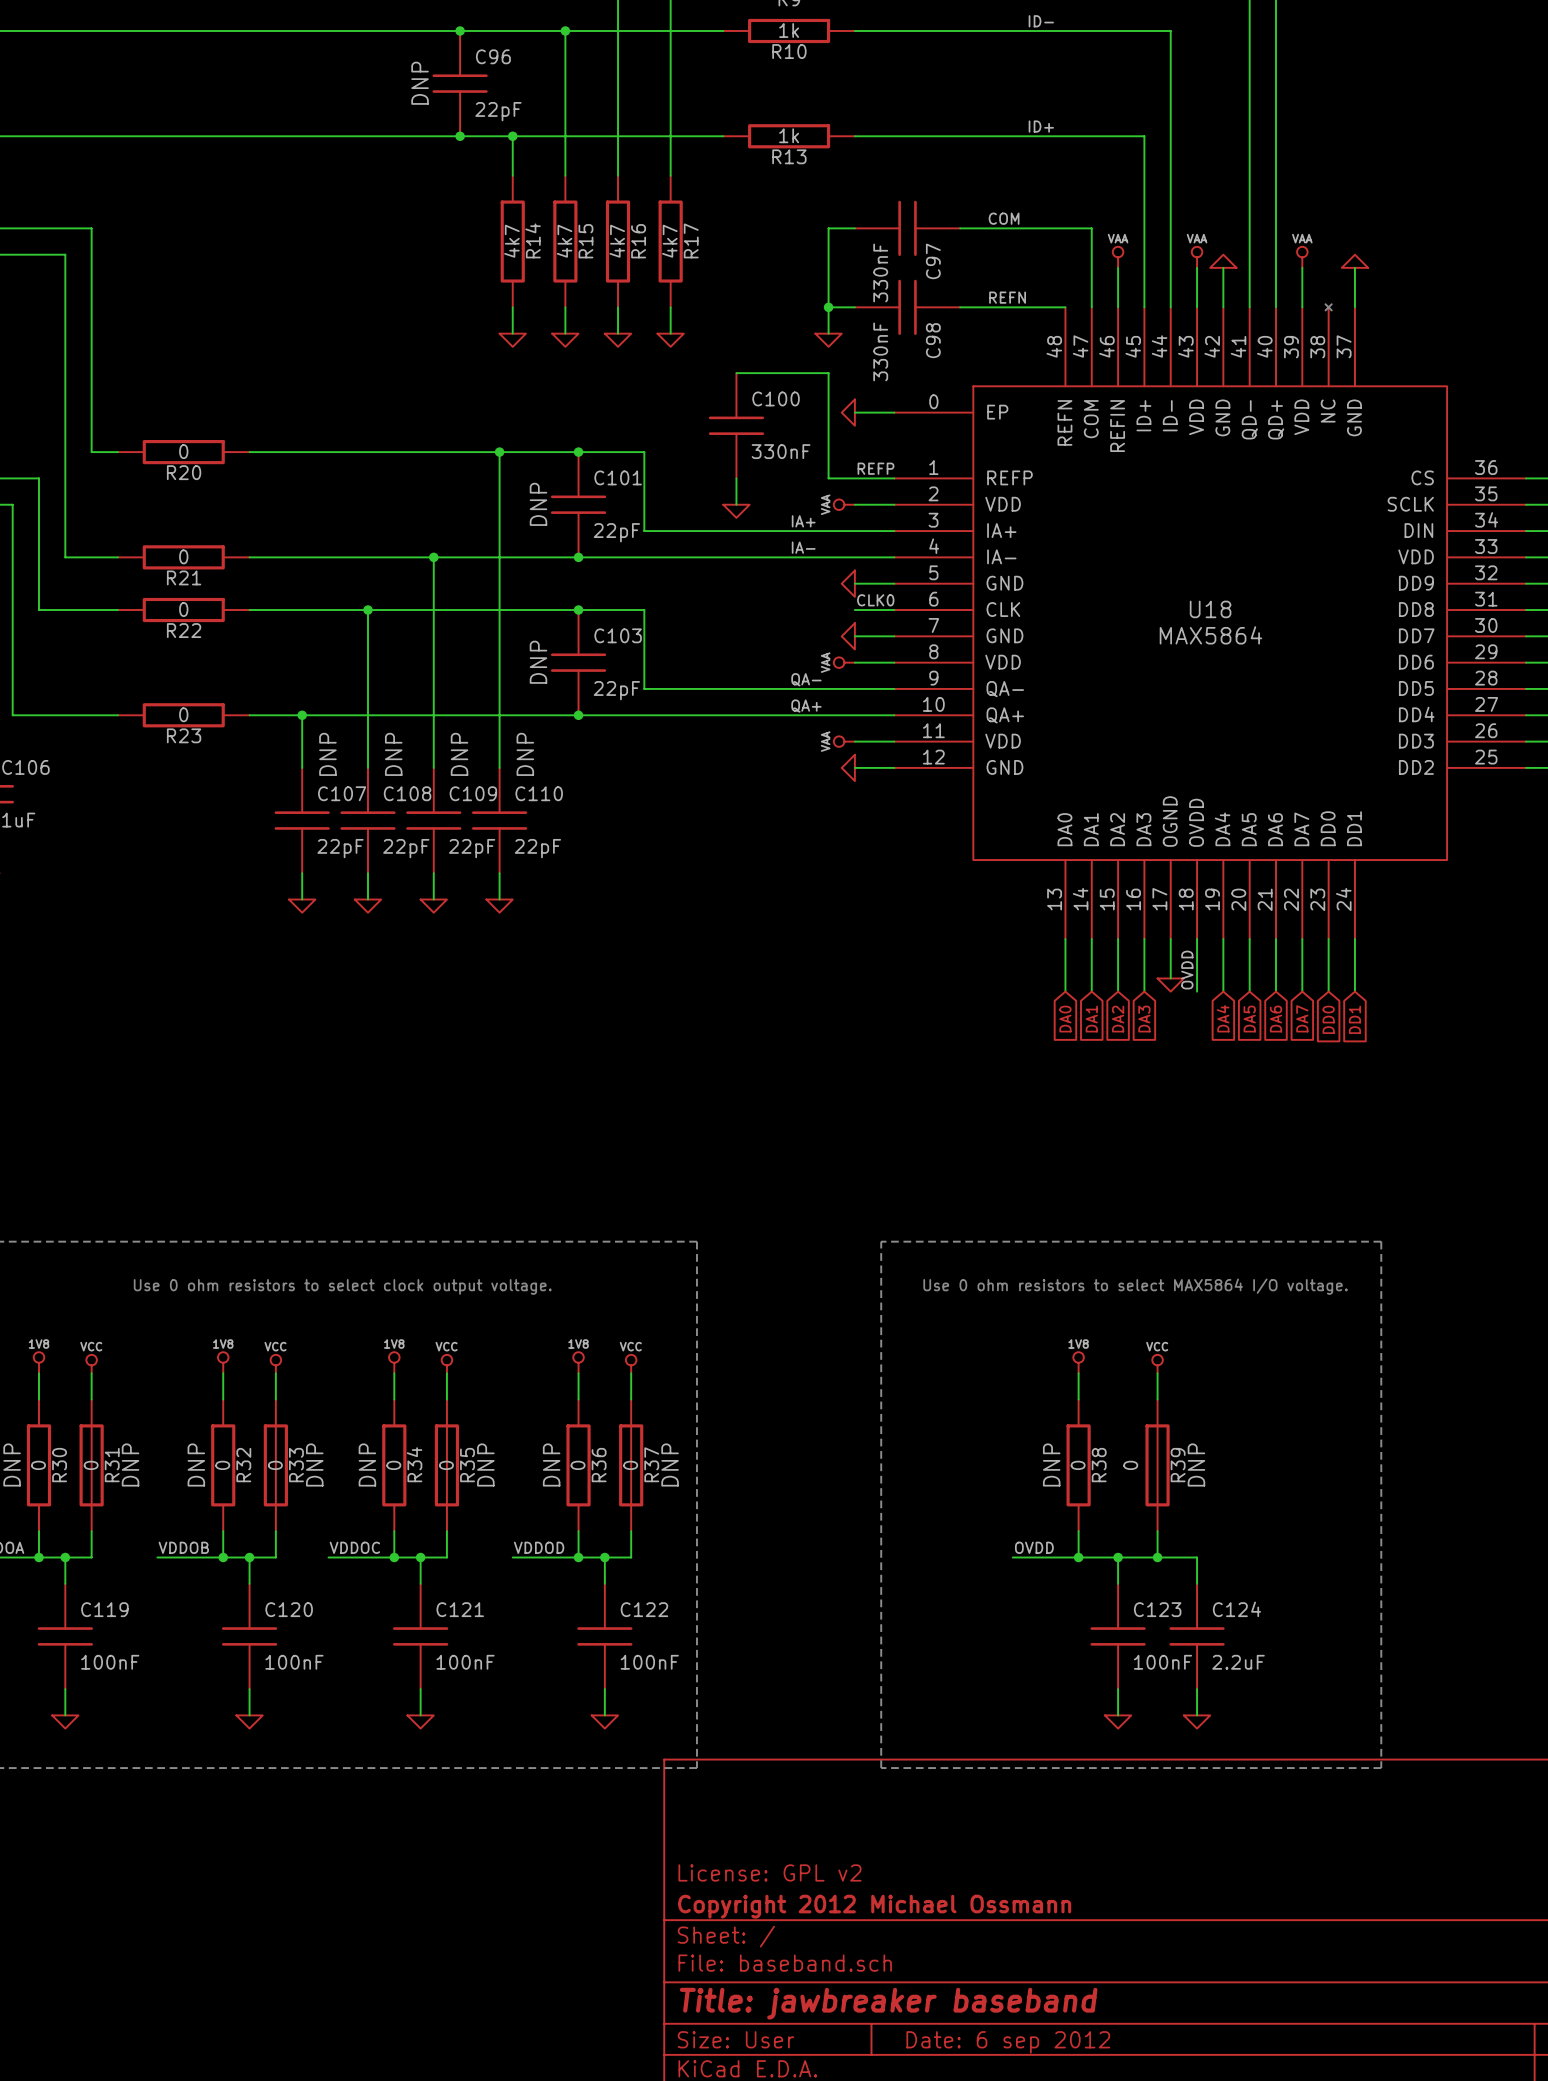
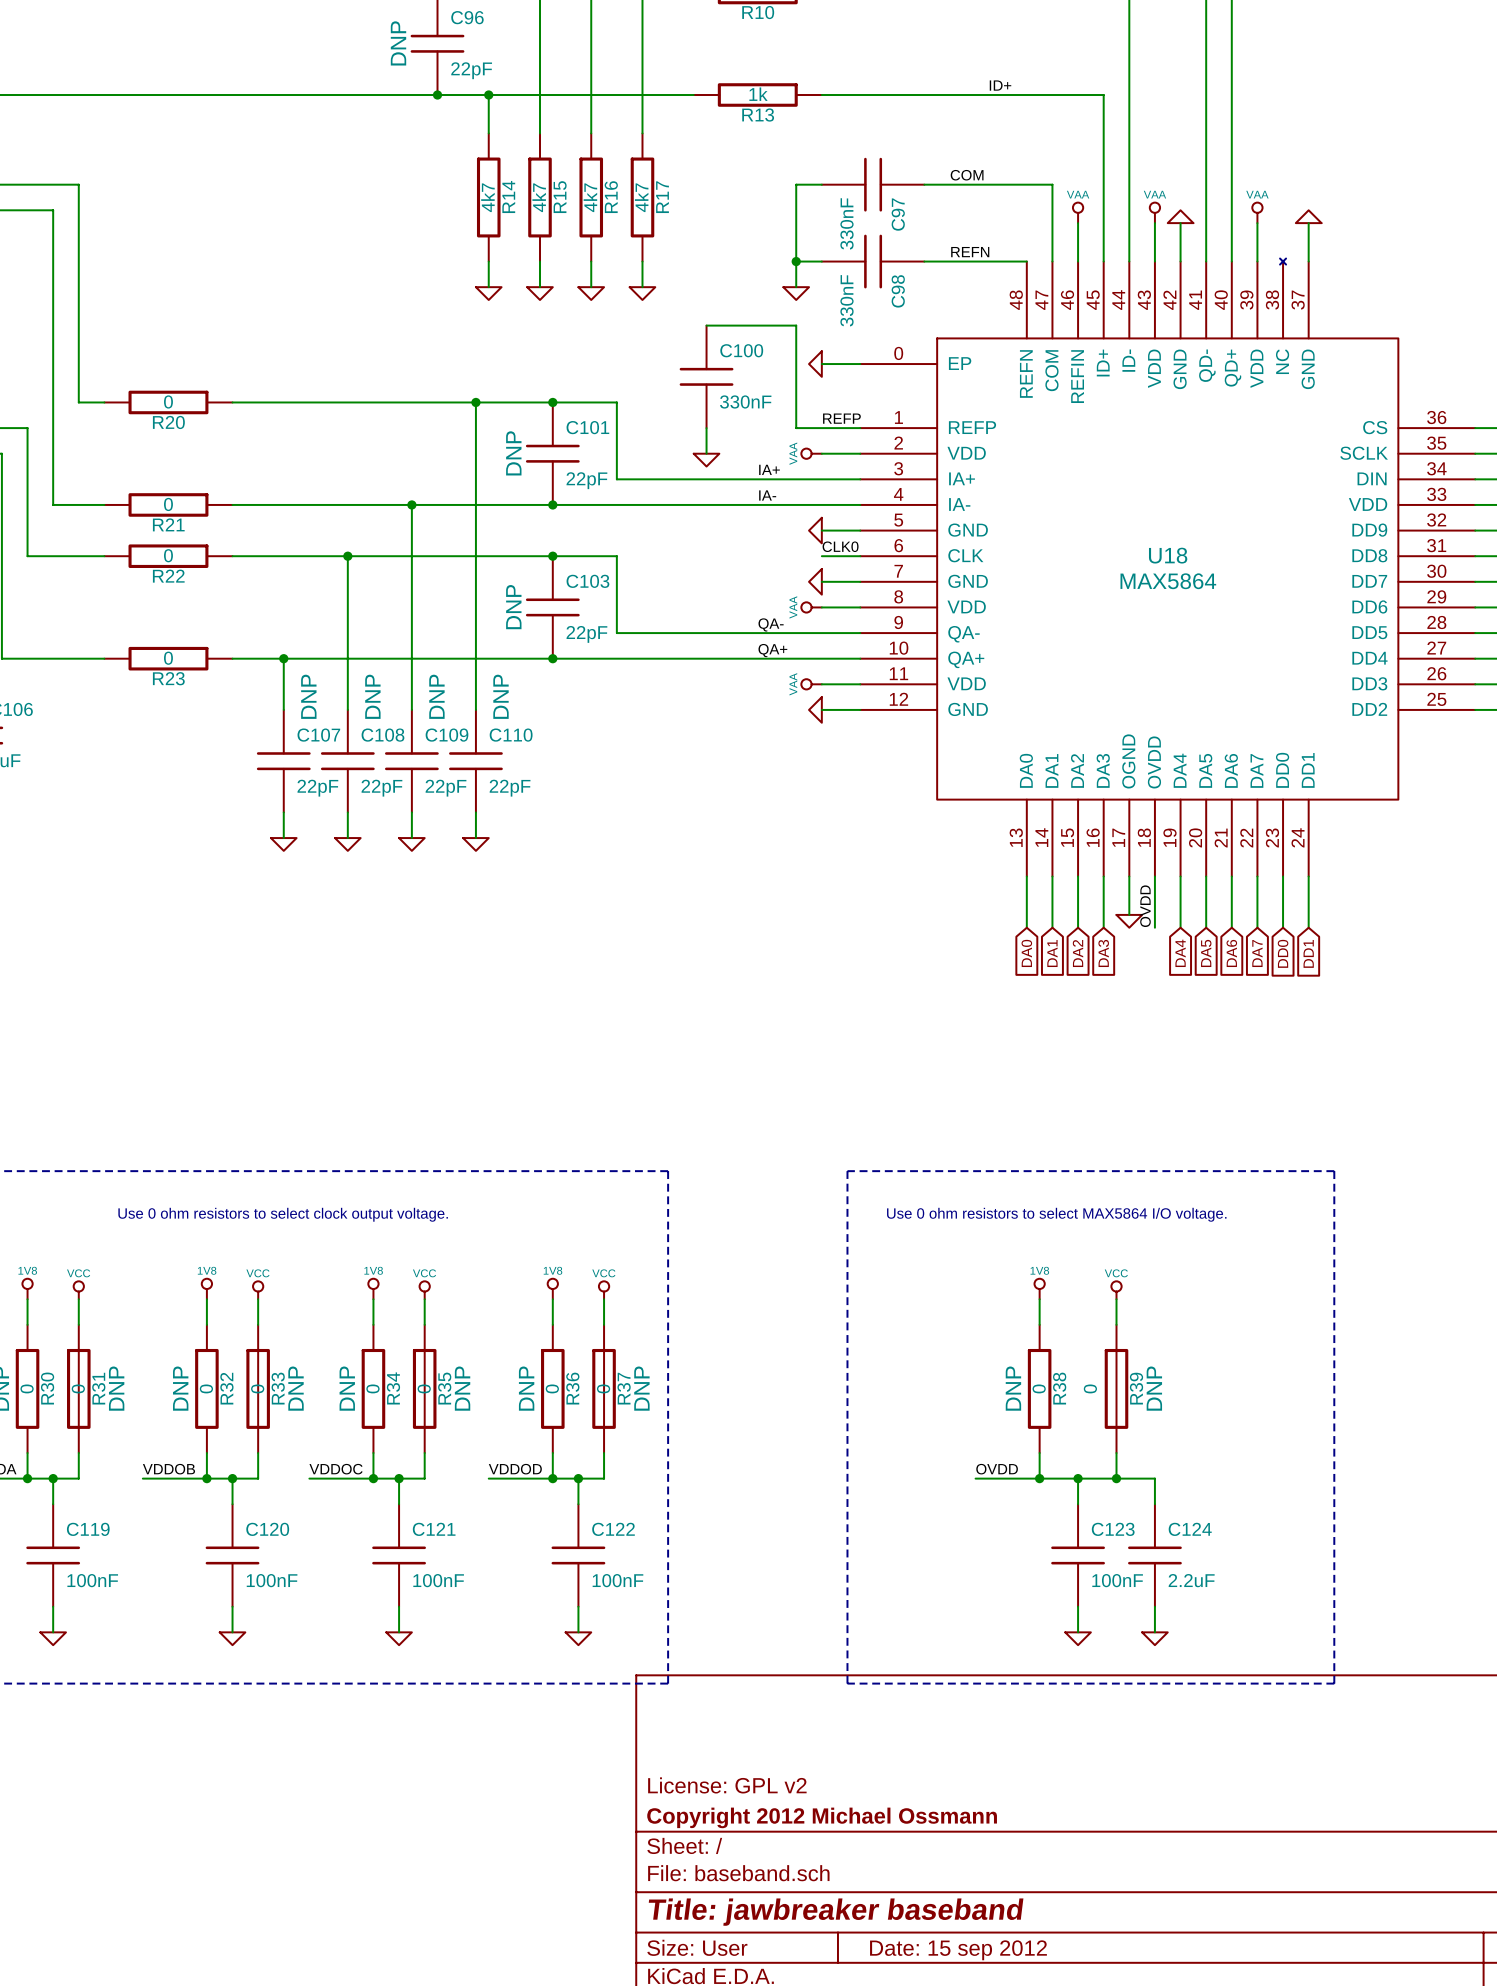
title block: Date: 6 sep 2012 (1008, 2042) -> Date: 15 sep 2012 (958, 1950)

